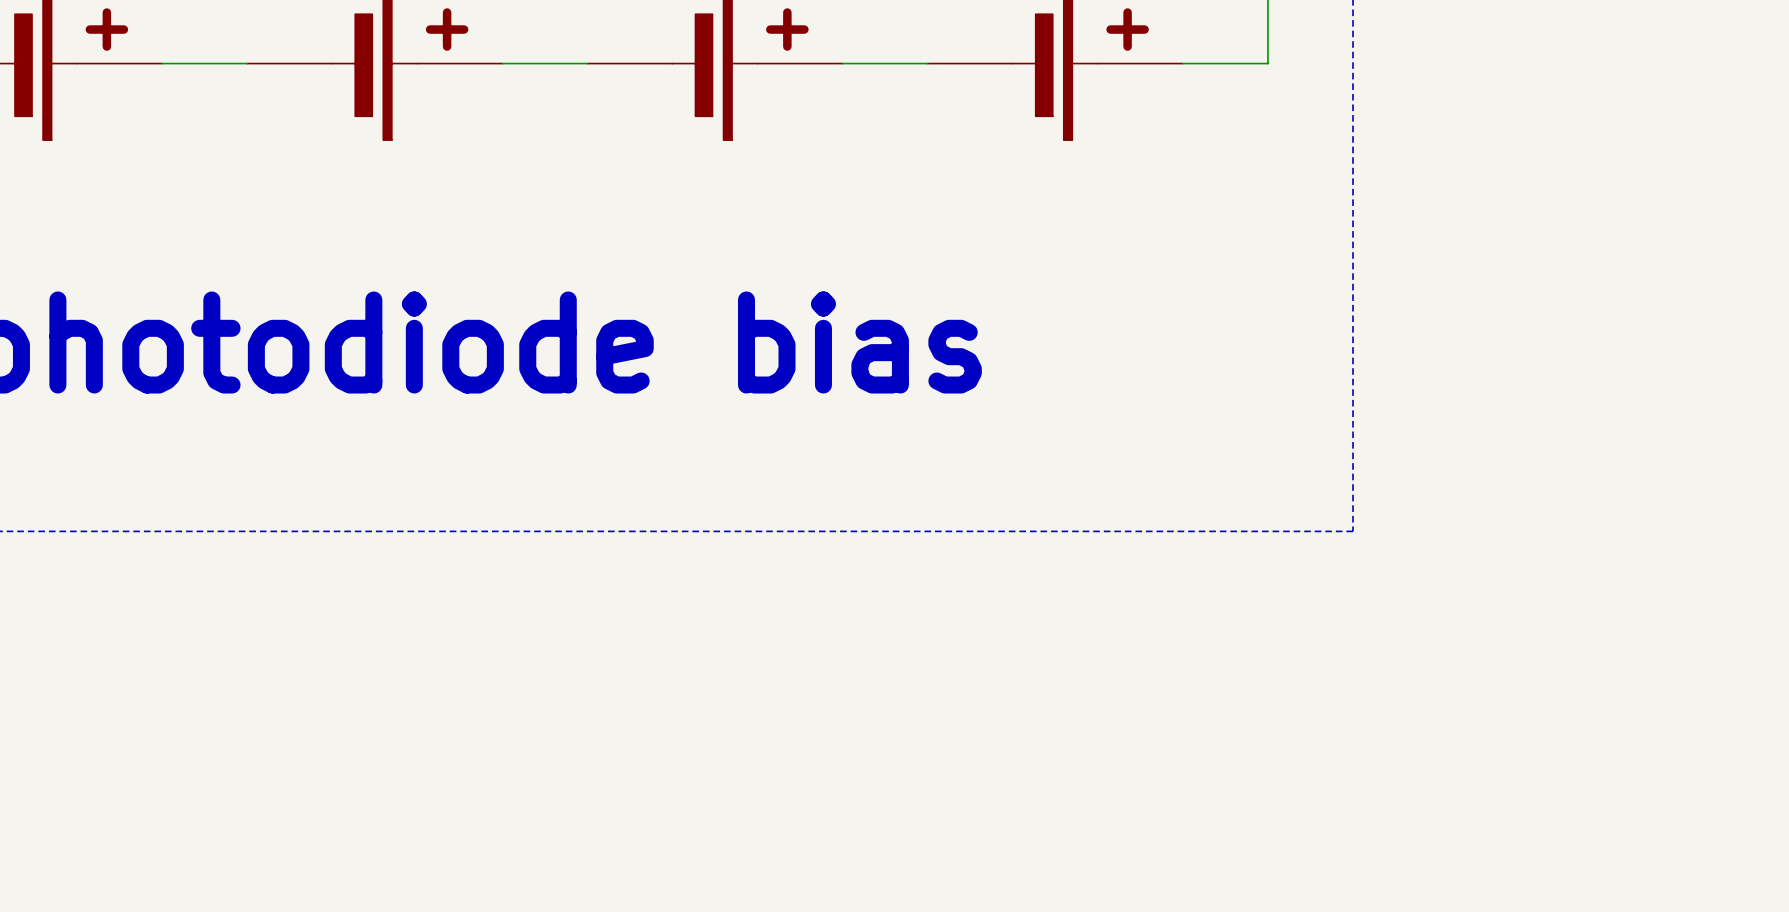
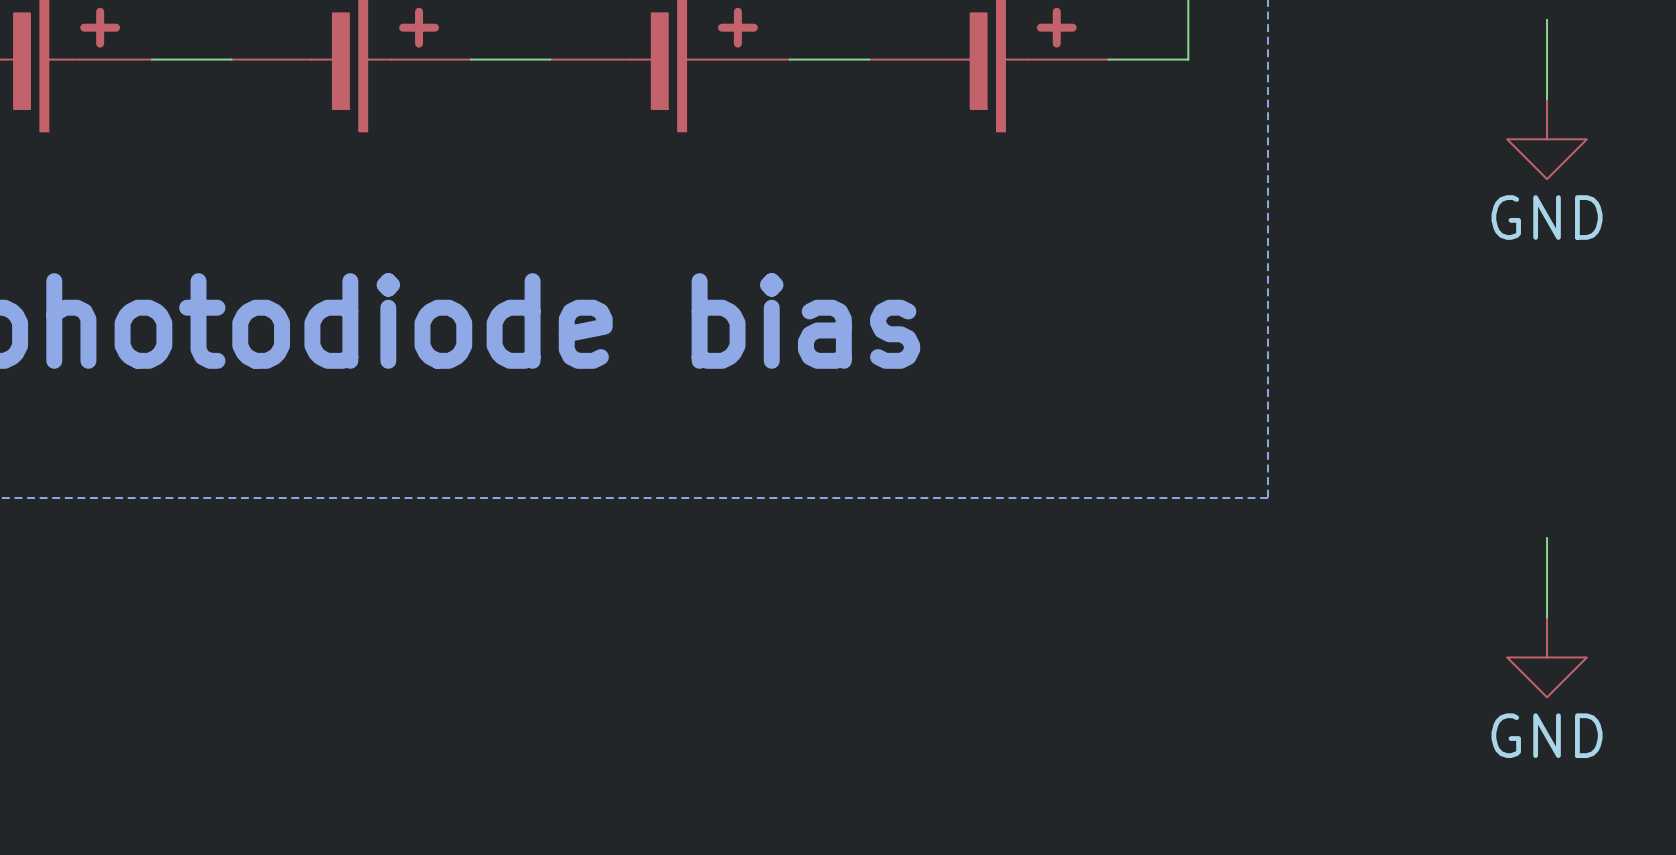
wire: none -> (1547, 19) (1547, 99)
power symbol: none -> GND (1547, 139)
wire: none -> (1547, 537) (1547, 617)
power symbol: none -> GND (1547, 657)

